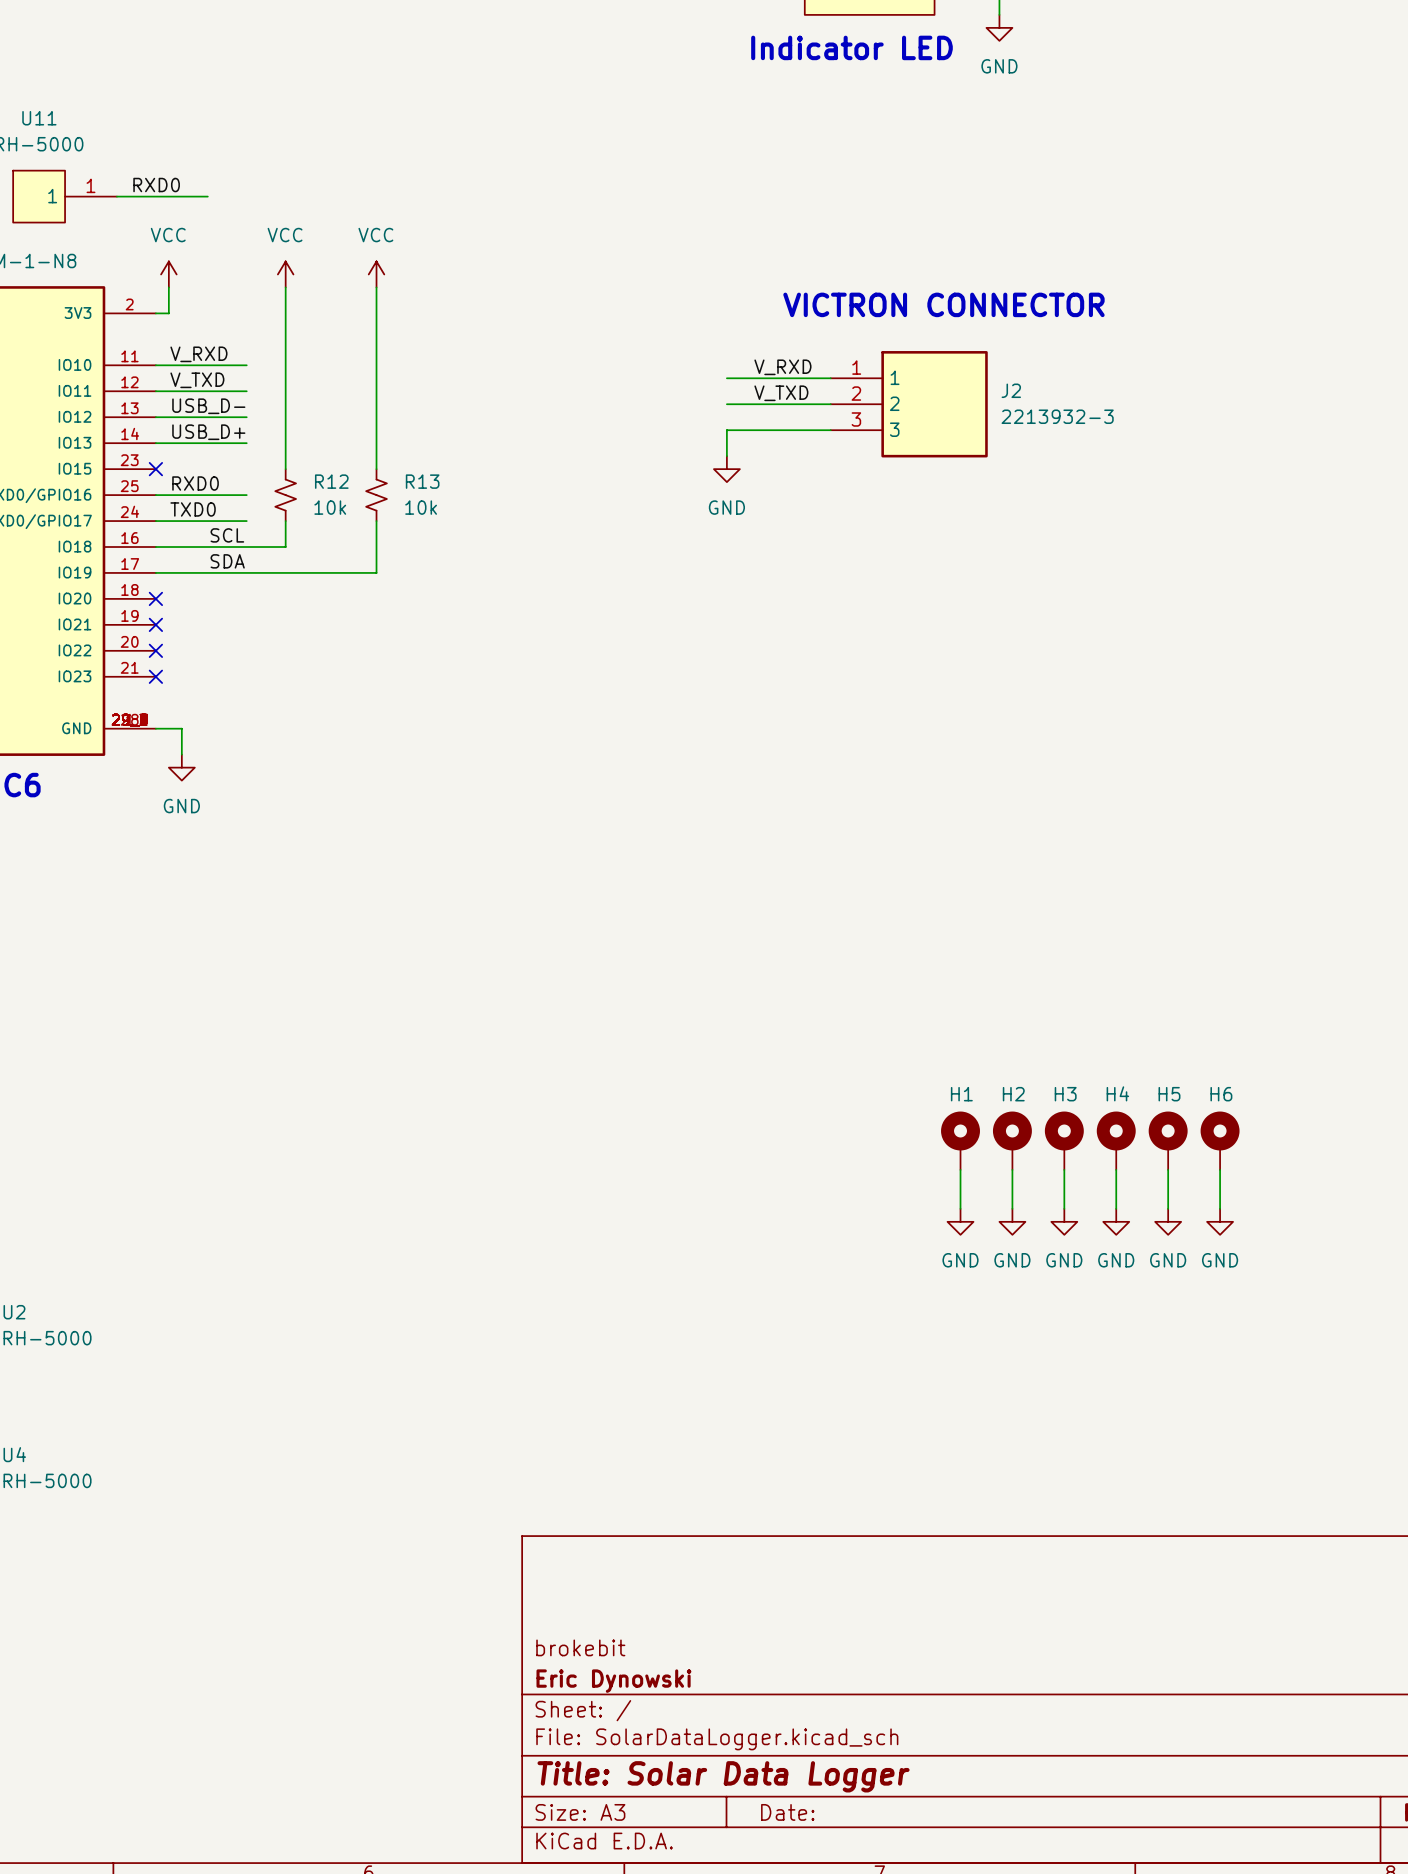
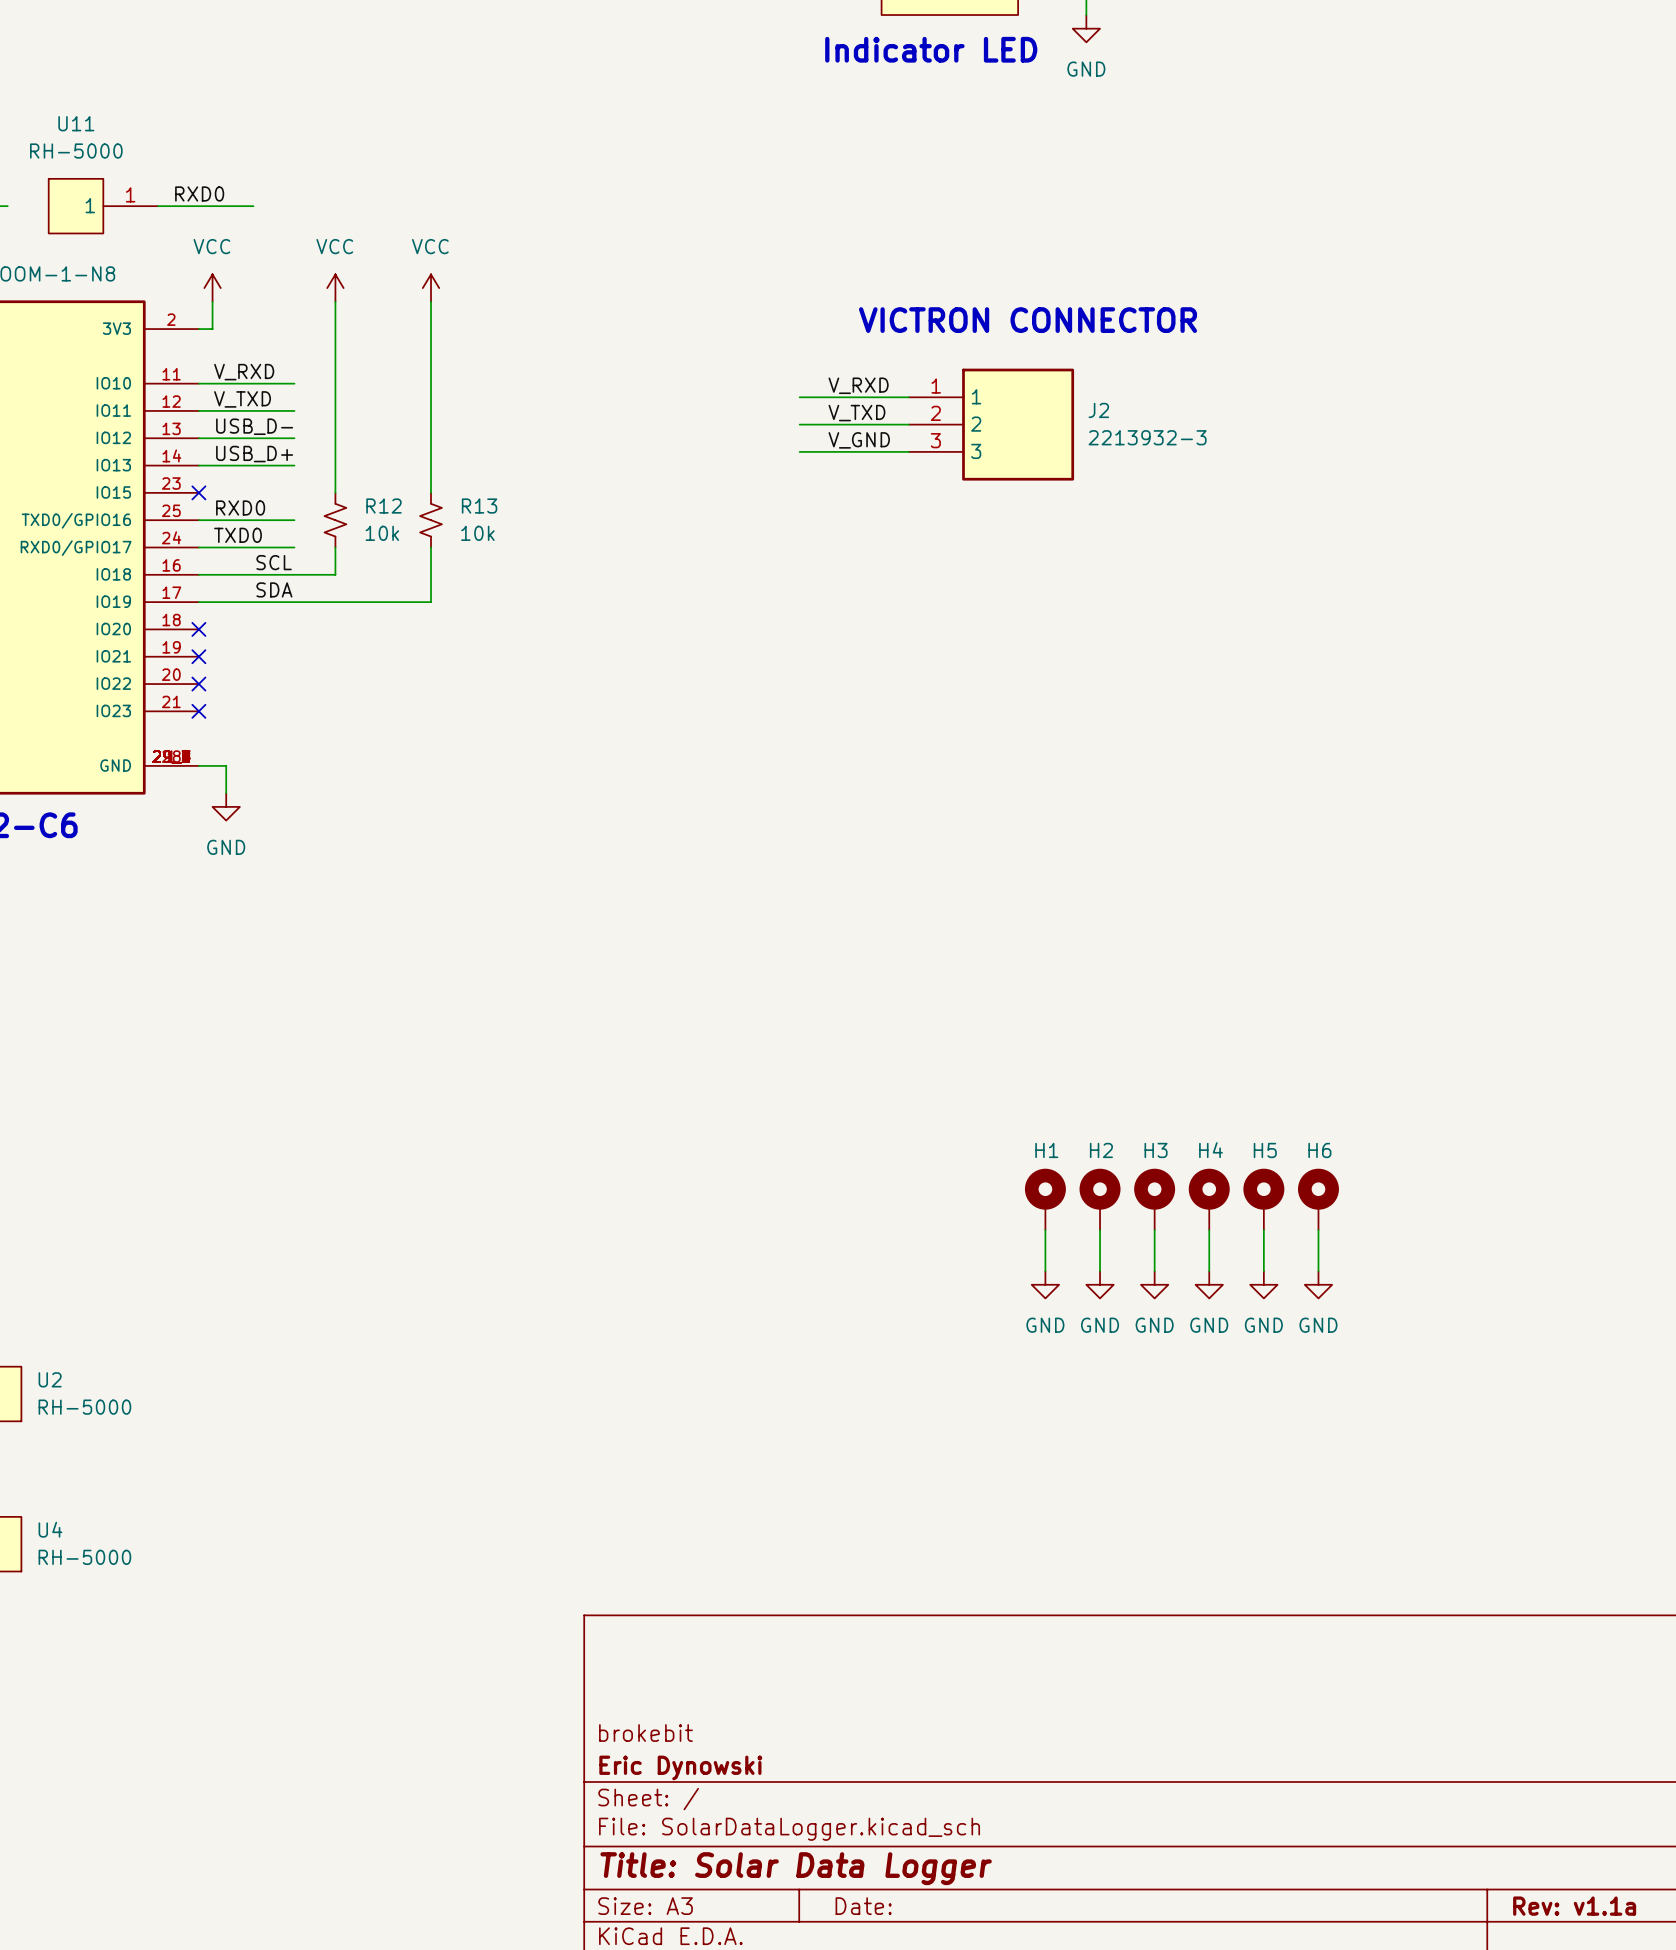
label: none -> V_GND (859, 440)
wire: (726, 430) (726, 456) -> none
power symbol: GND (726, 469) -> none

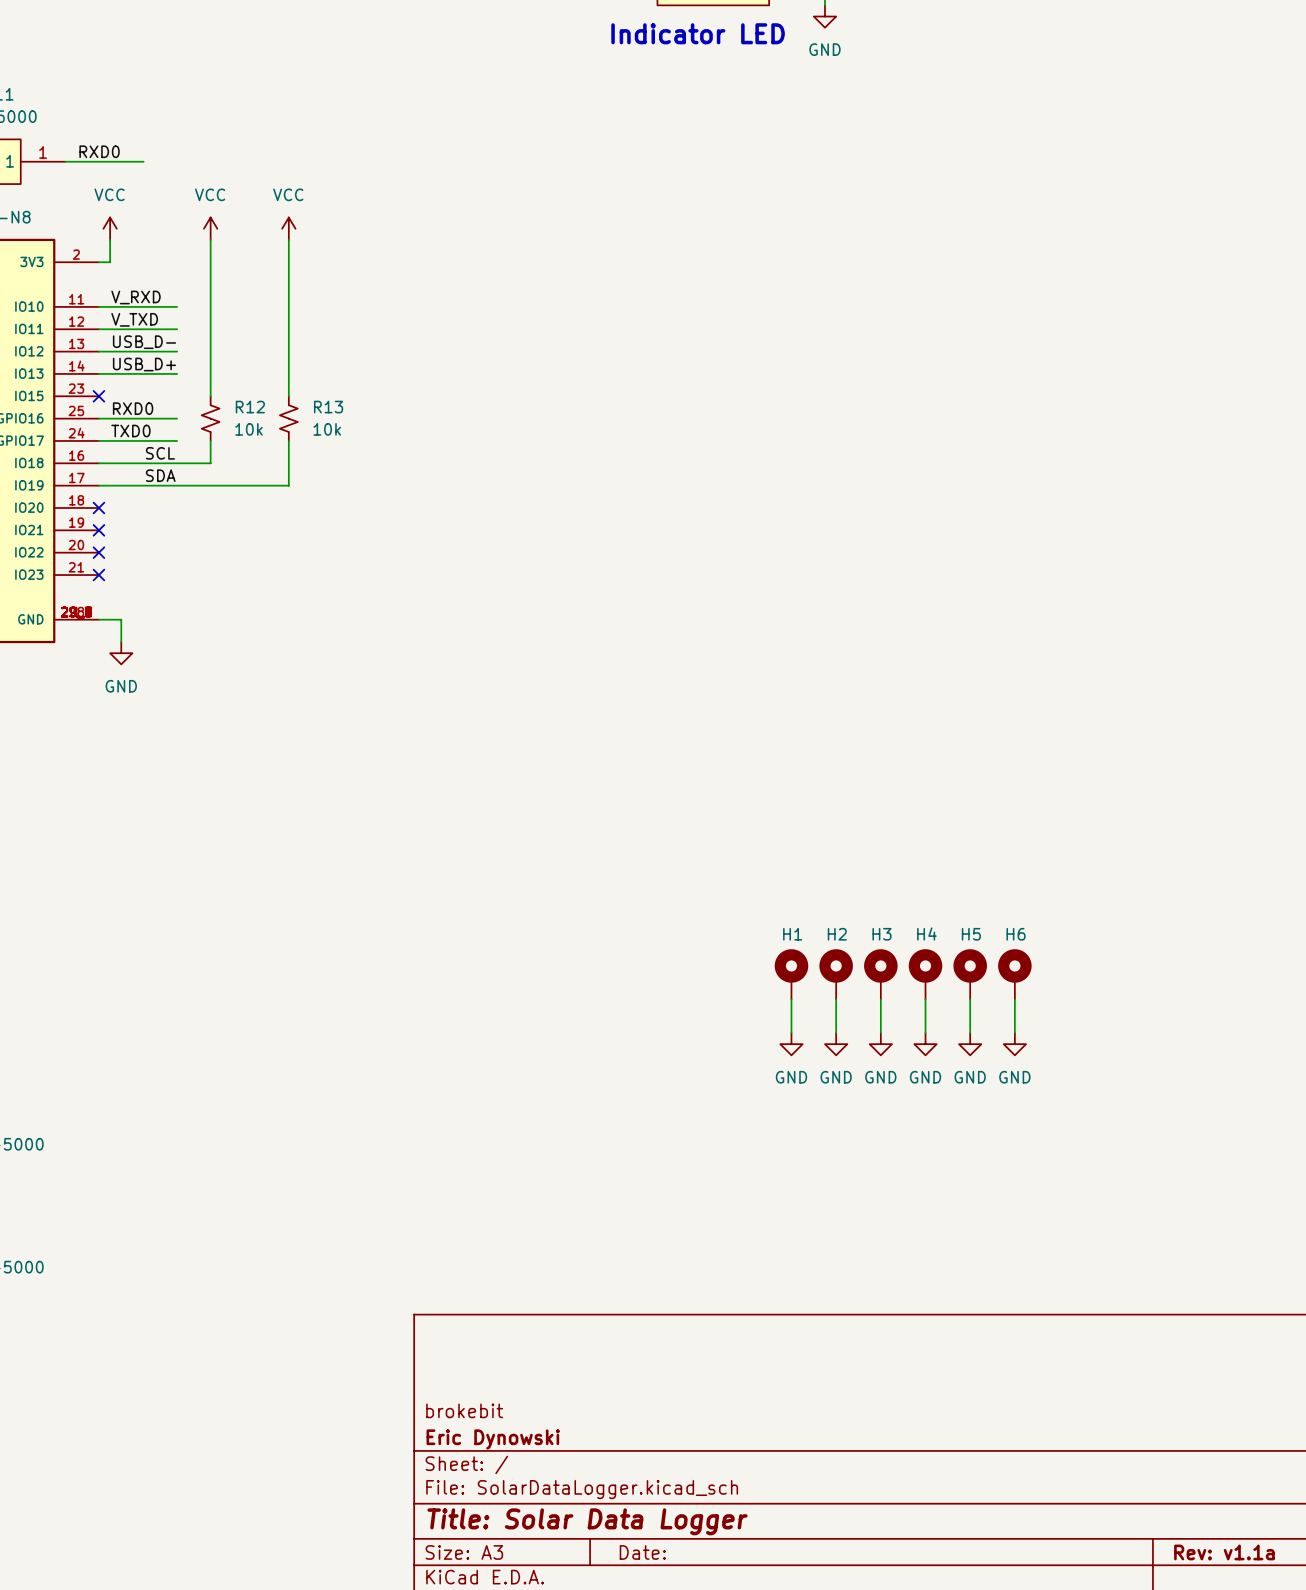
text: VICTRON CONNECTOR (1028, 320) -> none
label: V_RXD (858, 385) -> none
wire: (799, 397) (908, 397) -> none
label: V_TXD (856, 413) -> none
wire: (799, 424) (908, 424) -> none
J2: 2213932-3 (991, 424) -> none
label: V_GND (859, 440) -> none
wire: (799, 451) (908, 451) -> none

